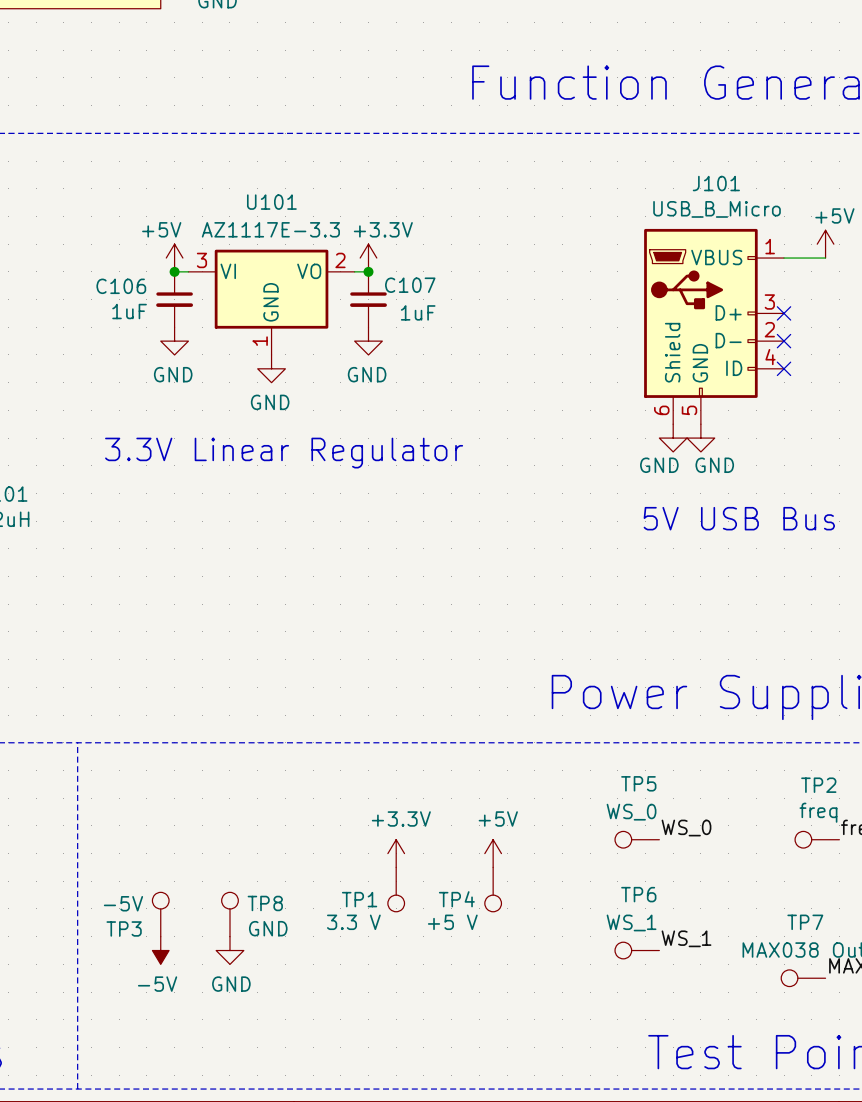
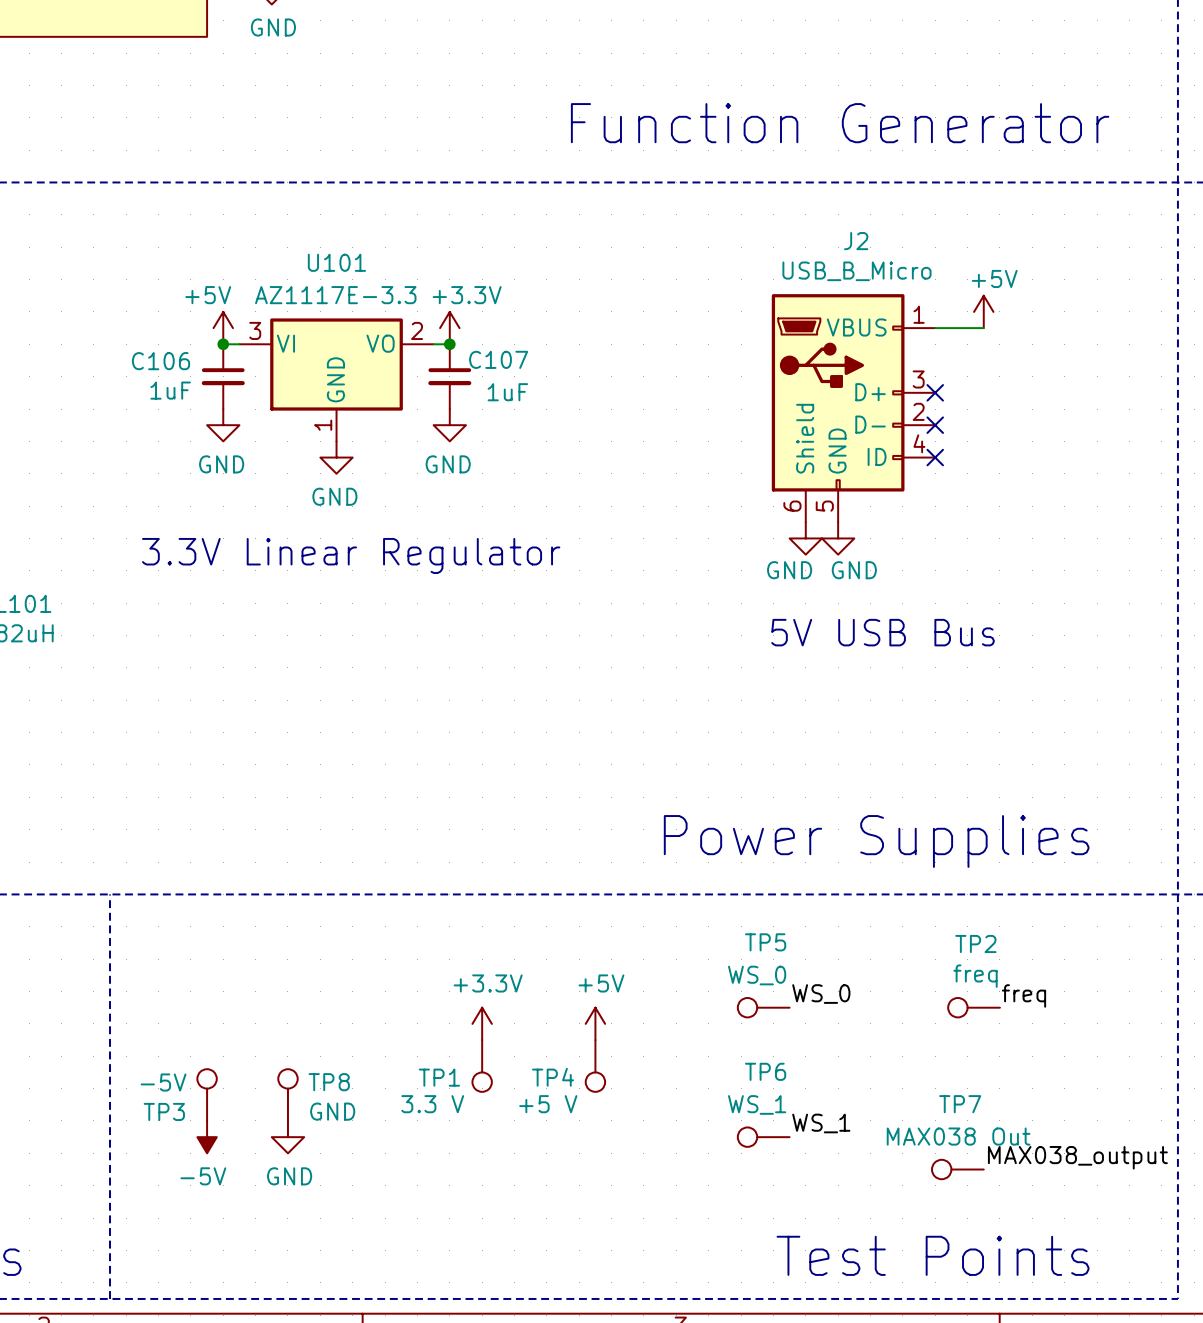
J101 name: J101 (716, 183) -> J2 (856, 241)

